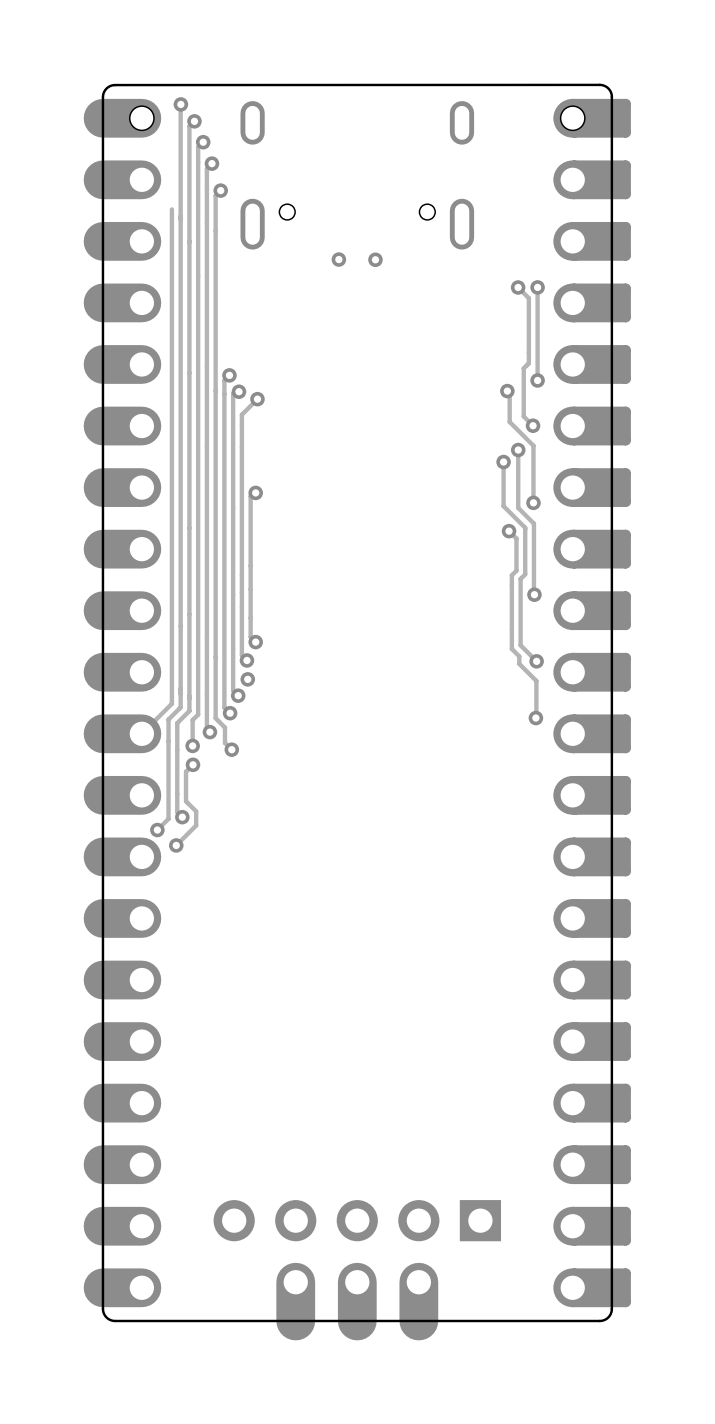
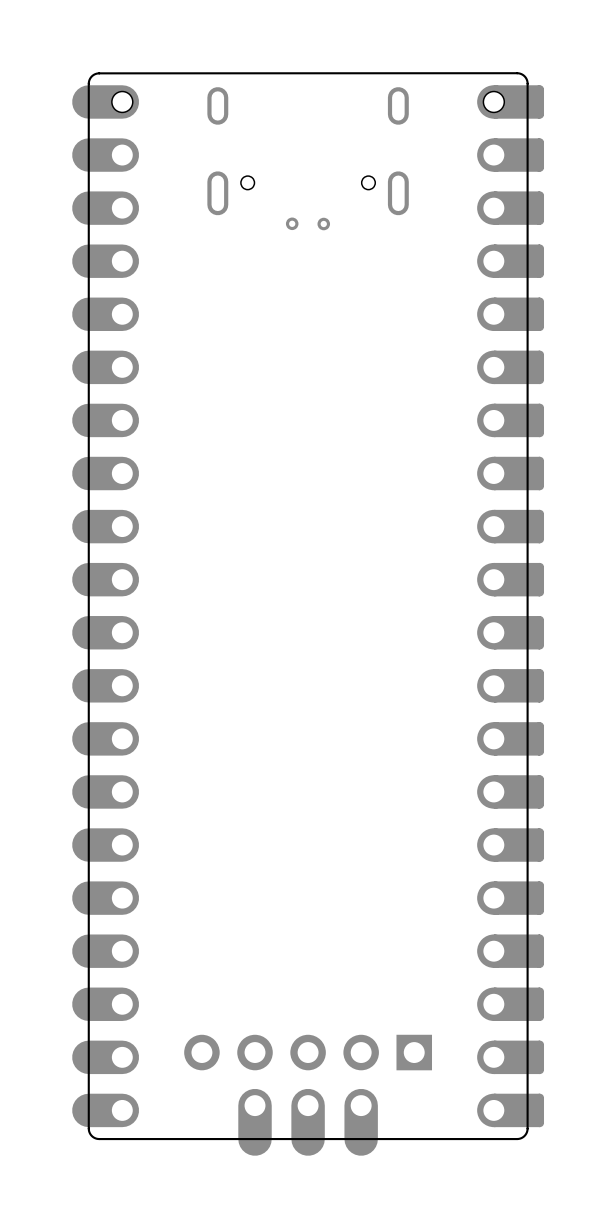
track: (180, 104) (180, 707) (168, 719) (168, 818) (157, 830) -> none
via: (180, 104) -> none
track: (194, 121) (189, 126) (189, 711) -> none
via: (194, 121) -> none
track: (203, 142) (198, 147) (198, 714) (192, 720) (192, 745) -> none
via: (203, 142) -> none
track: (211, 163) (206, 168) (206, 729) (209, 732) -> none
via: (211, 163) -> none
track: (220, 190) (215, 195) (215, 718) (224, 727) (224, 742) (231, 749) -> none
via: (220, 190) -> none
track: (171, 209) (171, 703) (141, 733) -> none
track: (518, 287) (528, 298) (528, 363) (523, 368) (523, 416) (533, 425) -> none
via: (518, 287) -> none
track: (537, 287) (537, 380) -> none
via: (537, 287) -> none
track: (229, 375) (224, 380) (224, 707) (230, 713) -> none
via: (229, 375) -> none
via: (537, 380) -> none
track: (238, 391) (233, 393) (233, 690) (238, 695) -> none
via: (238, 391) -> none
via: (507, 391) -> none
track: (509, 393) (509, 421) (533, 445) (533, 502) -> none
track: (257, 399) (241, 414) (241, 655) (246, 660) -> none
via: (257, 399) -> none
via: (533, 425) -> none
track: (518, 450) (518, 507) (533, 523) (534, 594) -> none
via: (518, 450) -> none
track: (503, 462) (503, 506) (525, 527) (525, 574) (520, 578) (520, 645) (536, 661) -> none
via: (503, 462) -> none
track: (255, 492) (250, 496) (250, 637) (255, 642) -> none
via: (255, 492) -> none
via: (533, 502) -> none
track: (509, 531) (516, 538) (516, 570) (511, 575) (511, 648) (519, 656) (519, 663) (536, 680) (535, 718) -> none
via: (509, 531) -> none
via: (534, 594) -> none
via: (255, 642) -> none
via: (246, 660) -> none
via: (536, 661) -> none
via: (247, 679) -> none
via: (238, 695) -> none
track: (189, 711) (177, 723) (177, 812) (182, 817) -> none
via: (230, 713) -> none
via: (535, 718) -> none
via: (209, 732) -> none
via: (192, 745) -> none
via: (231, 749) -> none
track: (192, 764) (186, 771) (186, 801) (196, 811) (196, 825) (176, 845) -> none
via: (192, 764) -> none
via: (182, 817) -> none
via: (157, 830) -> none
via: (176, 845) -> none

